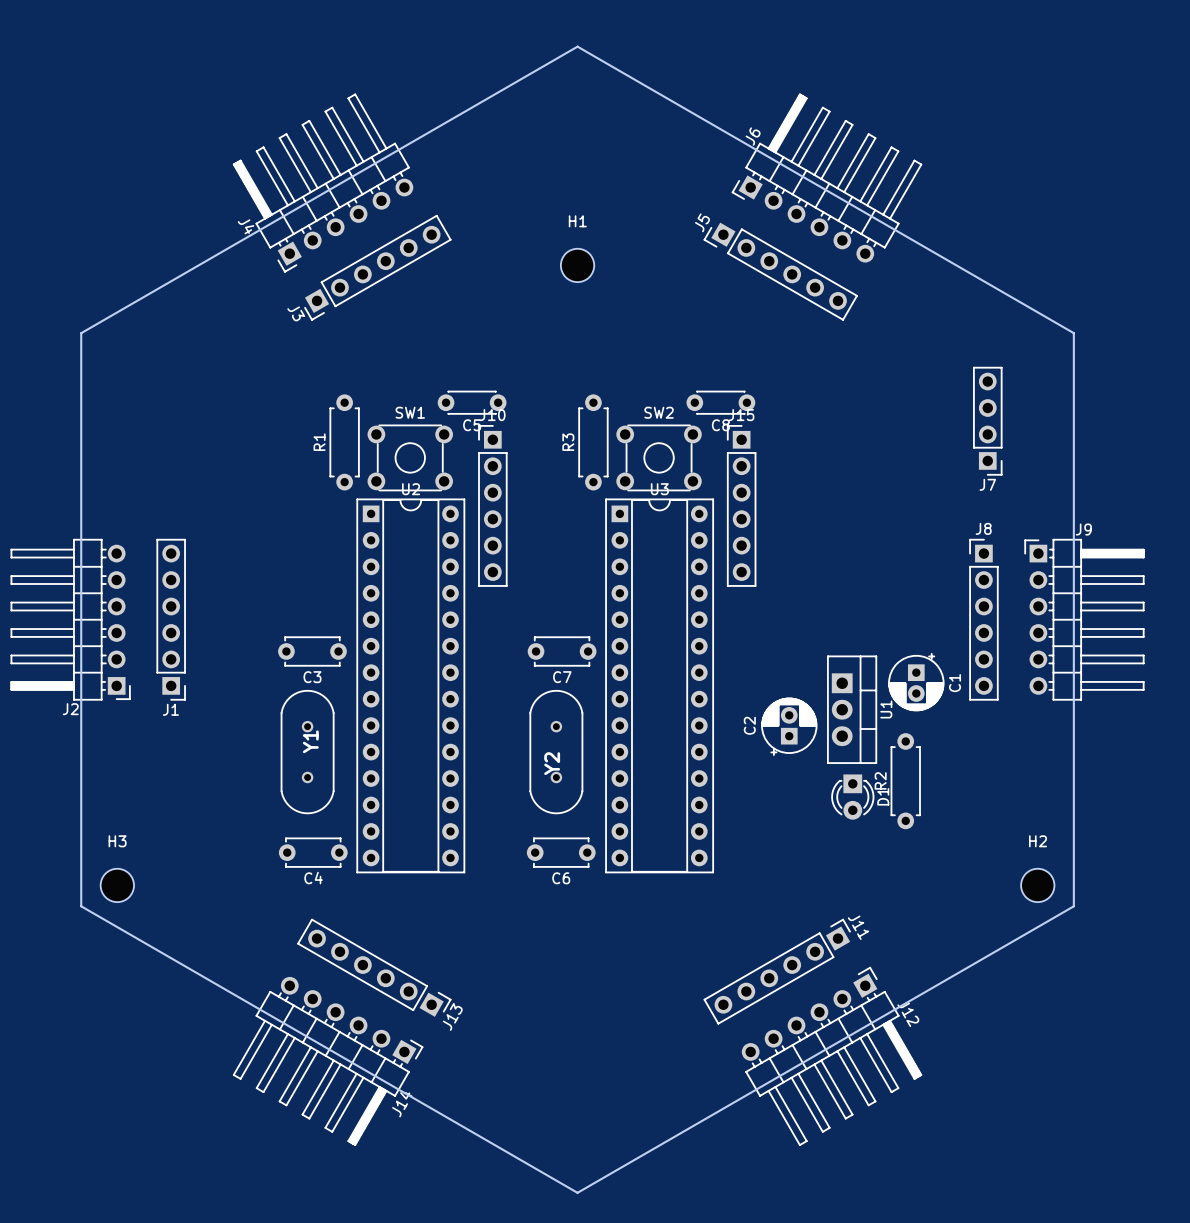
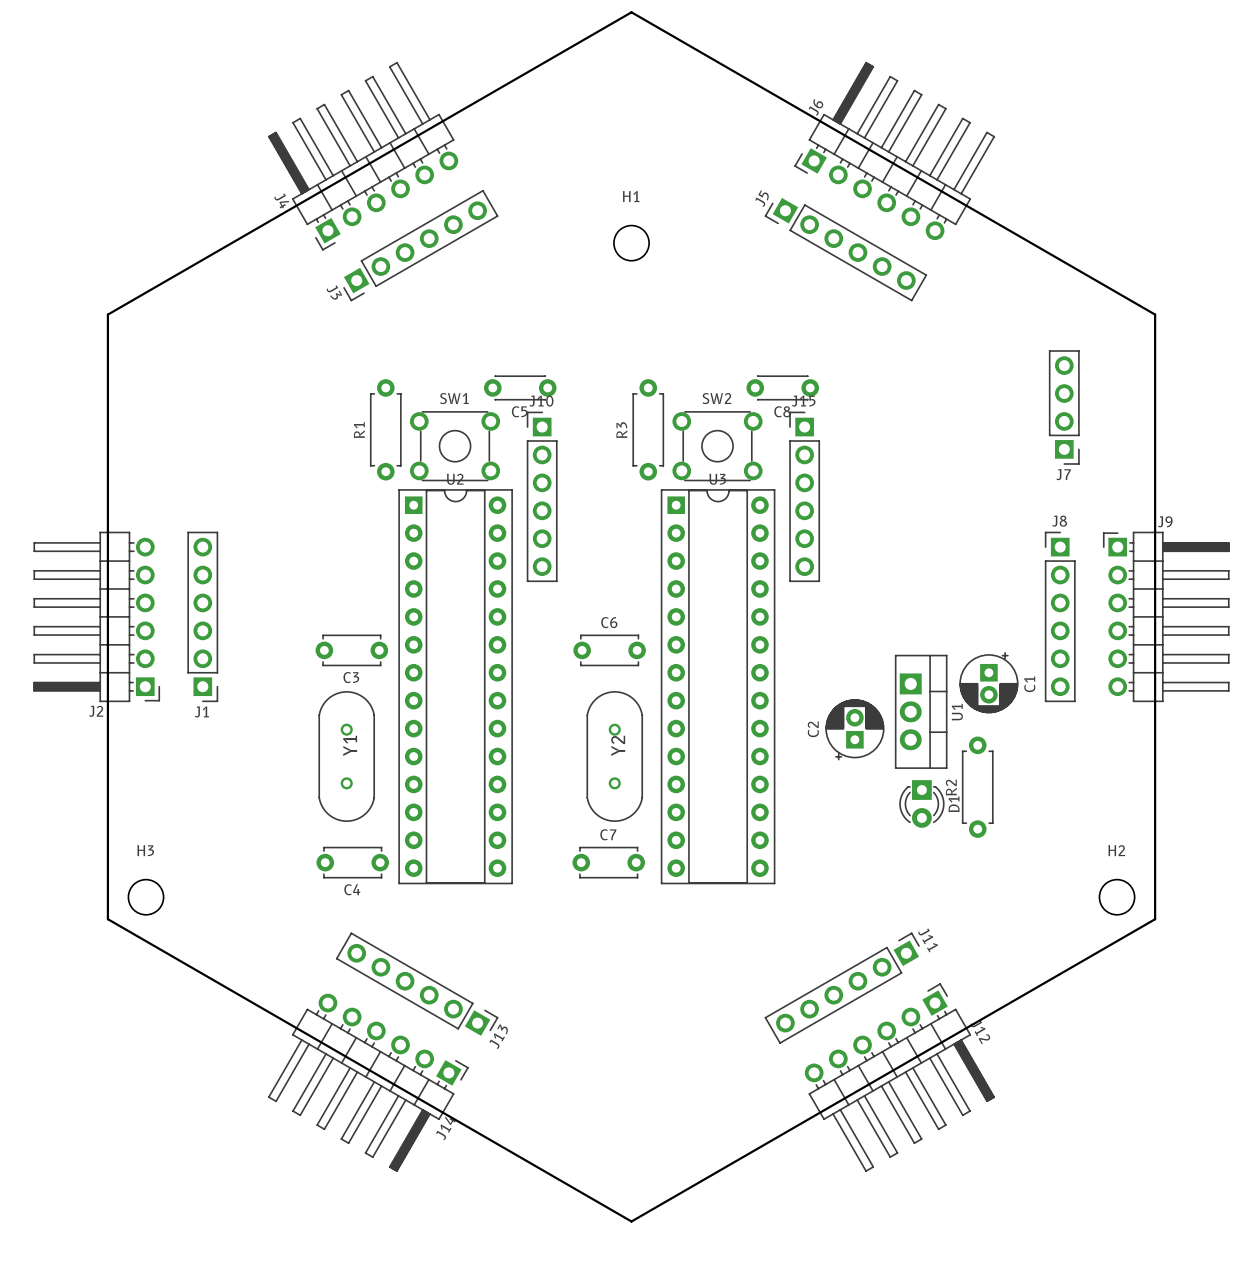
C7 position: (562, 651) -> (608, 862)
C7 name position: C7 (562, 677) -> C7 (608, 834)
Y2 rotation: 0° (556, 752) -> 180° (614, 756)
C6 position: (561, 852) -> (609, 650)
C6 name position: C6 (561, 878) -> C6 (609, 622)

